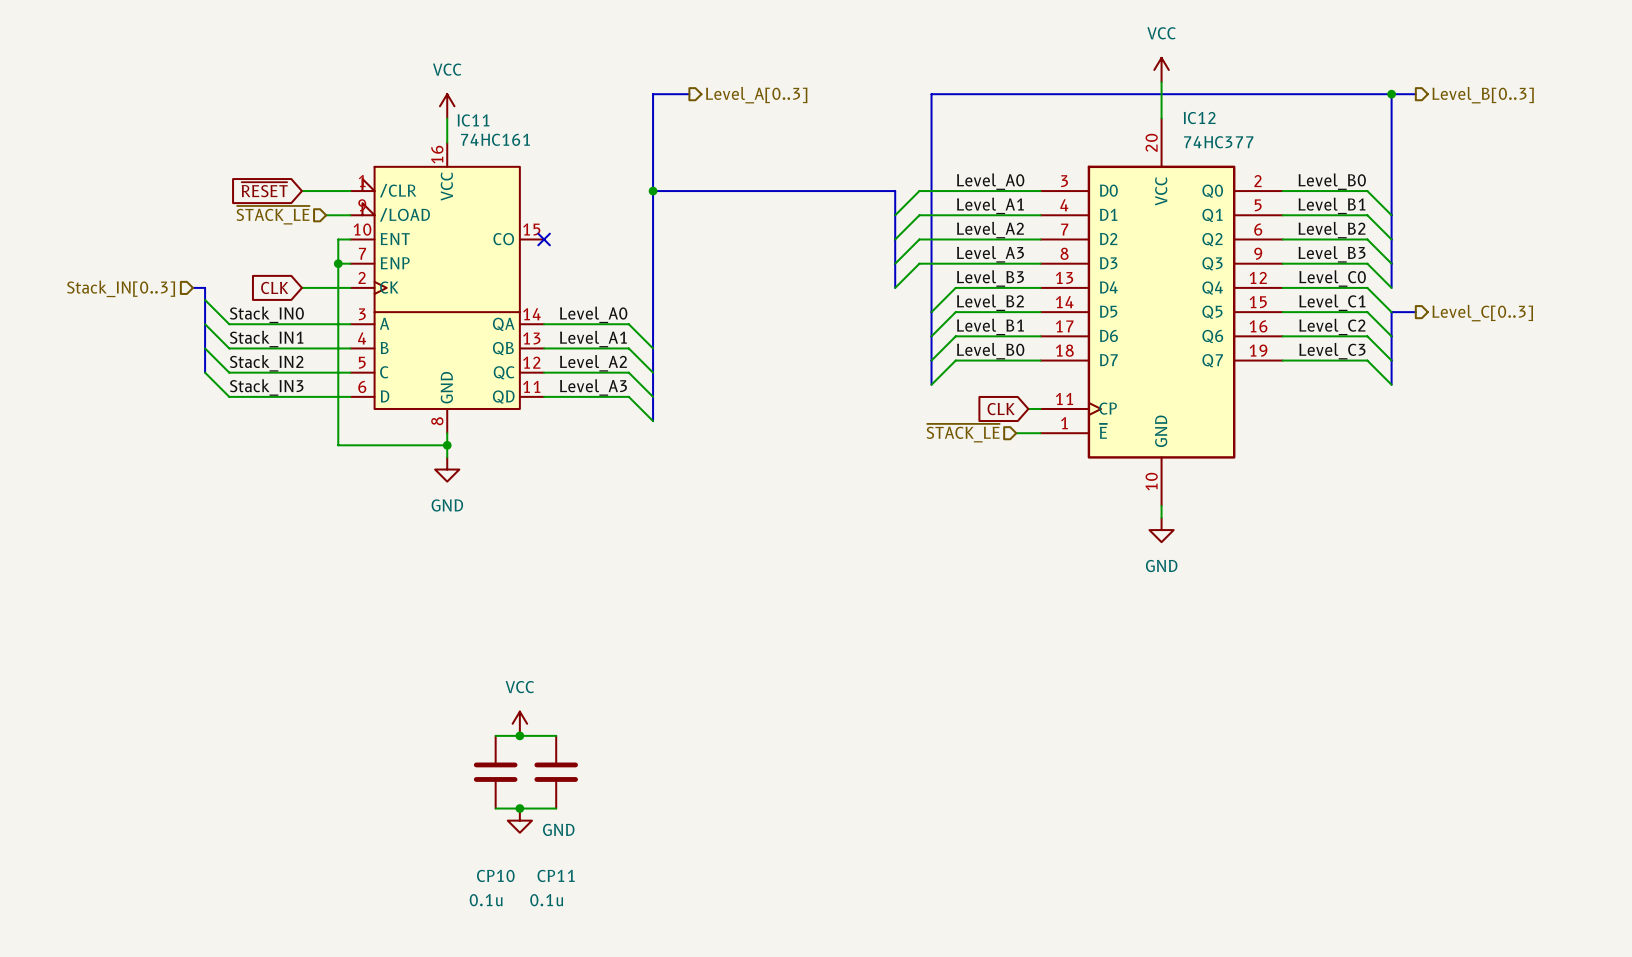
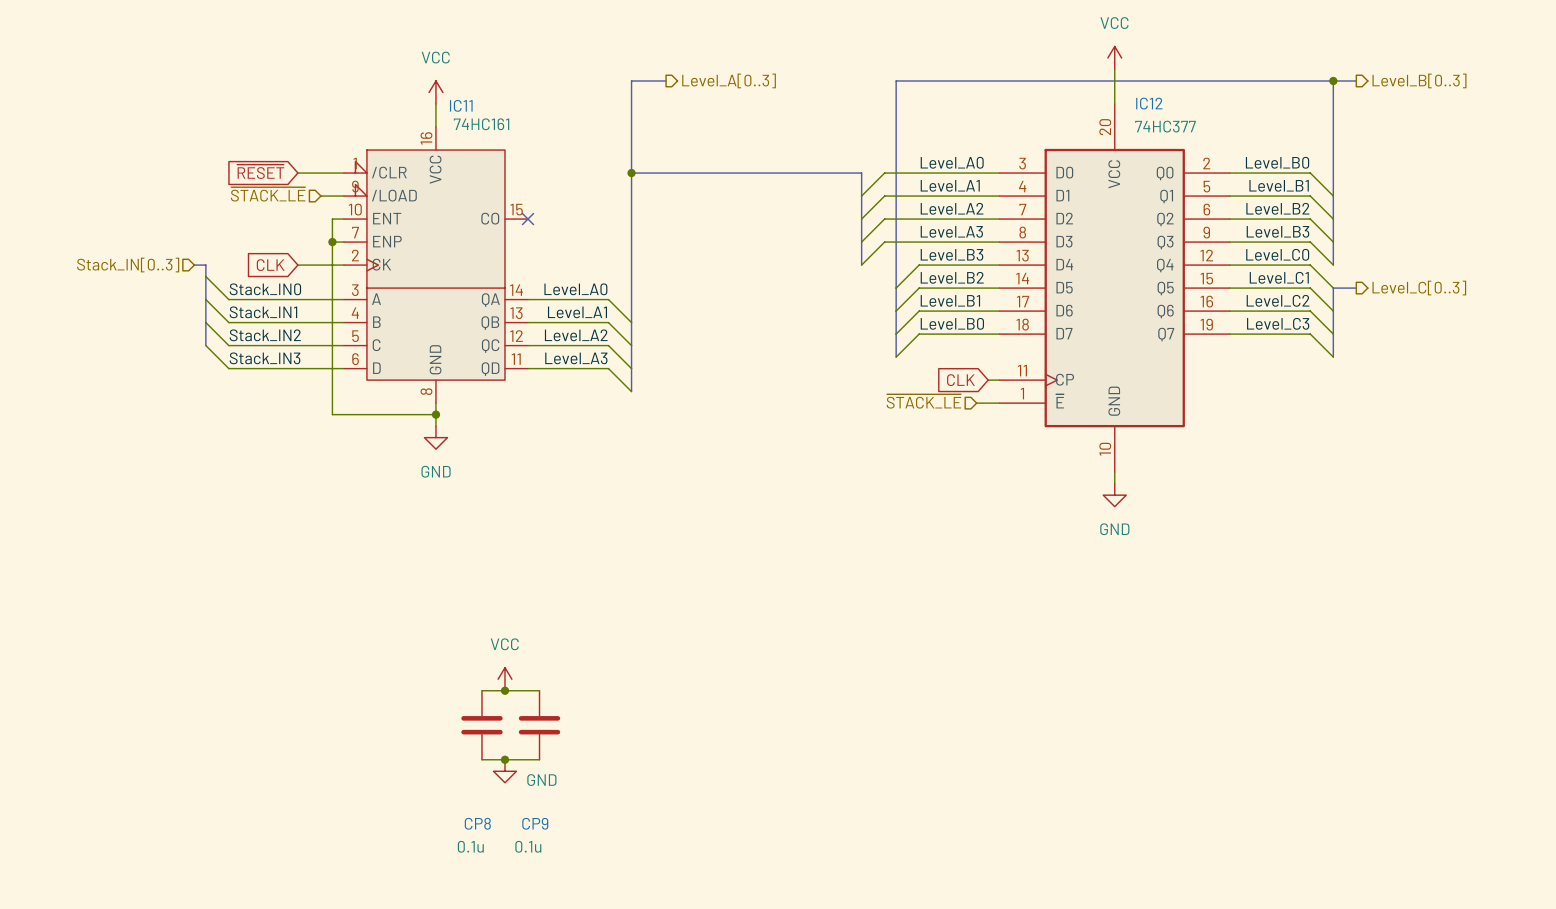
CP10 name: CP10 (495, 875) -> CP8 (477, 823)
CP11 name: CP11 (556, 875) -> CP9 (535, 823)

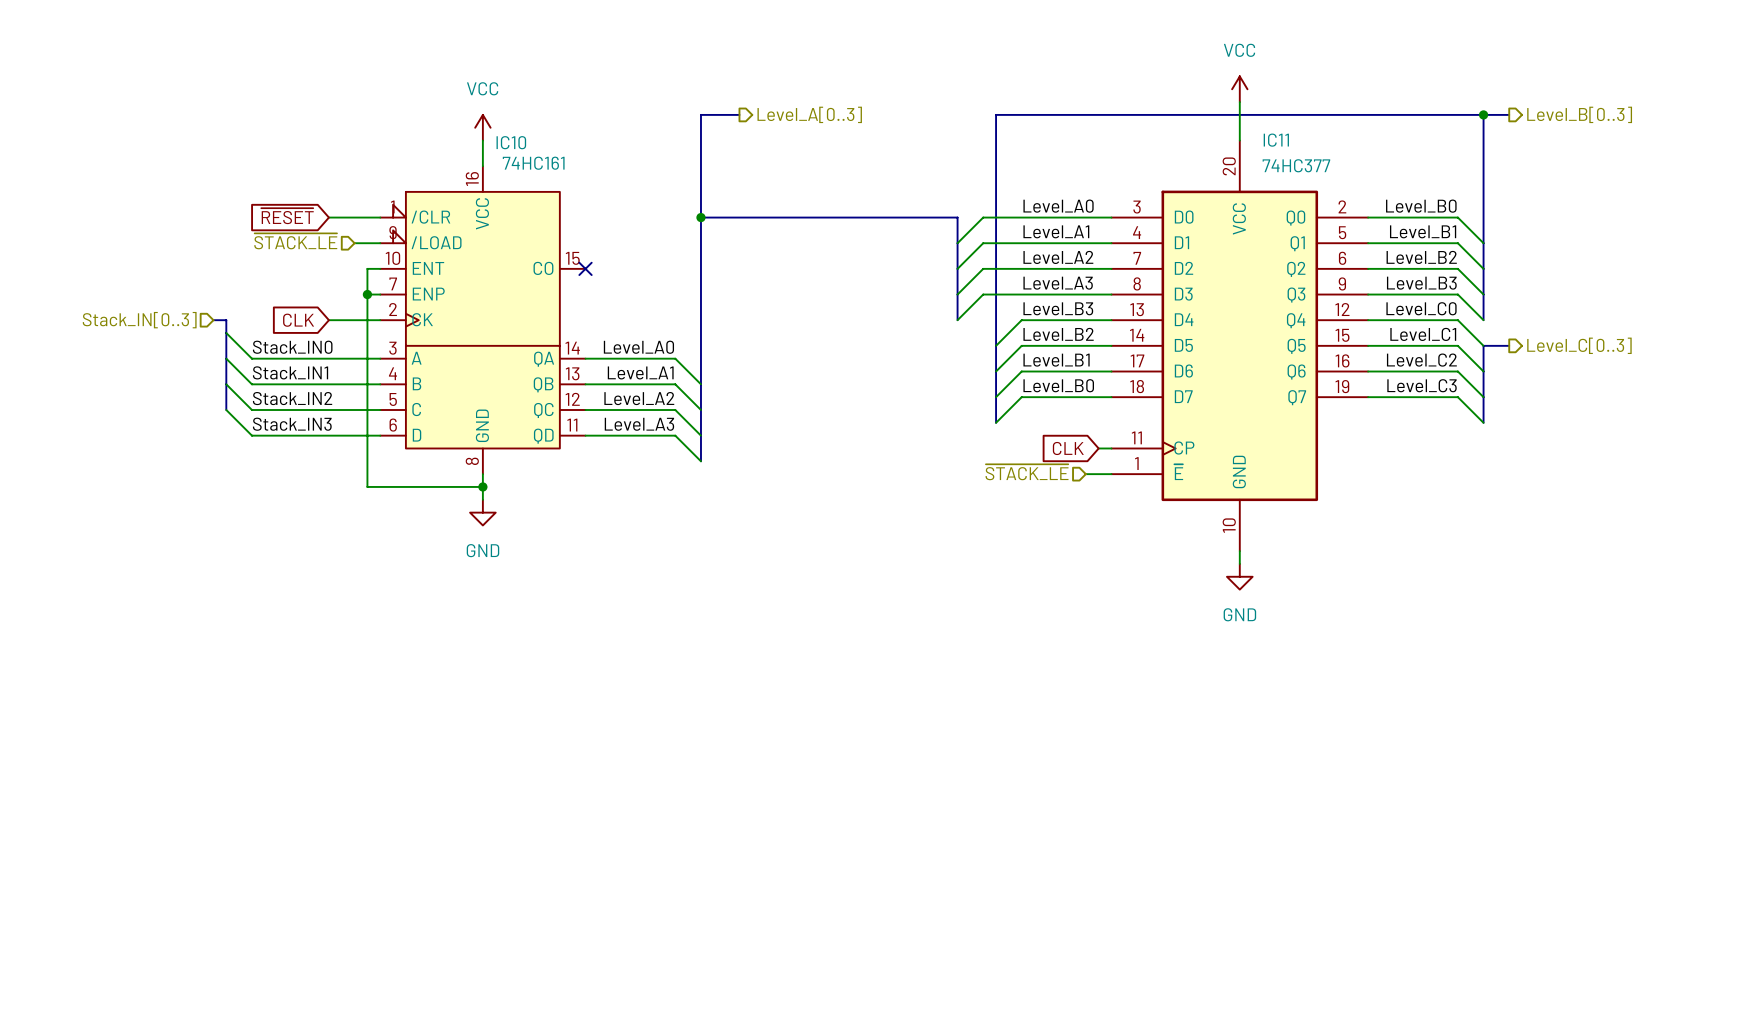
IC12 name: IC12 (1149, 103) -> IC11 (1276, 140)
IC11 name: IC11 (461, 105) -> IC10 (511, 142)
power symbol: VCC (504, 679) -> none
wire: (481, 690) (539, 690) -> none
junction: (504, 690) -> none
CP8: 0.1u (481, 725) -> none
CP9: 0.1u (539, 725) -> none
wire: (481, 759) (539, 759) -> none
junction: (504, 759) -> none
power symbol: GND (504, 771) -> none

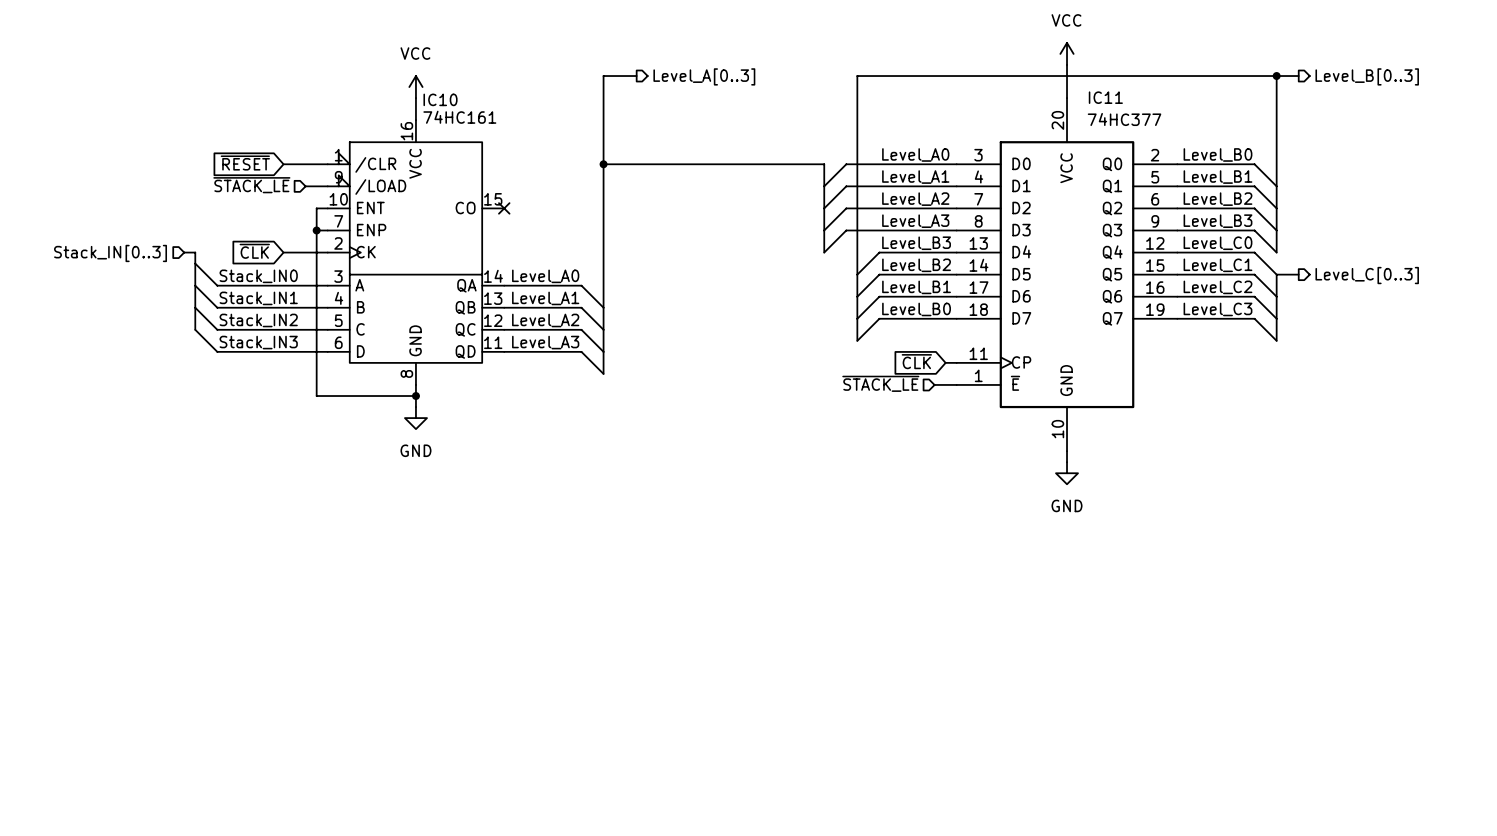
global label: CLK (298, 320) -> ~{CLK} (254, 251)
global label: CLK (1068, 448) -> ~{CLK} (916, 361)

